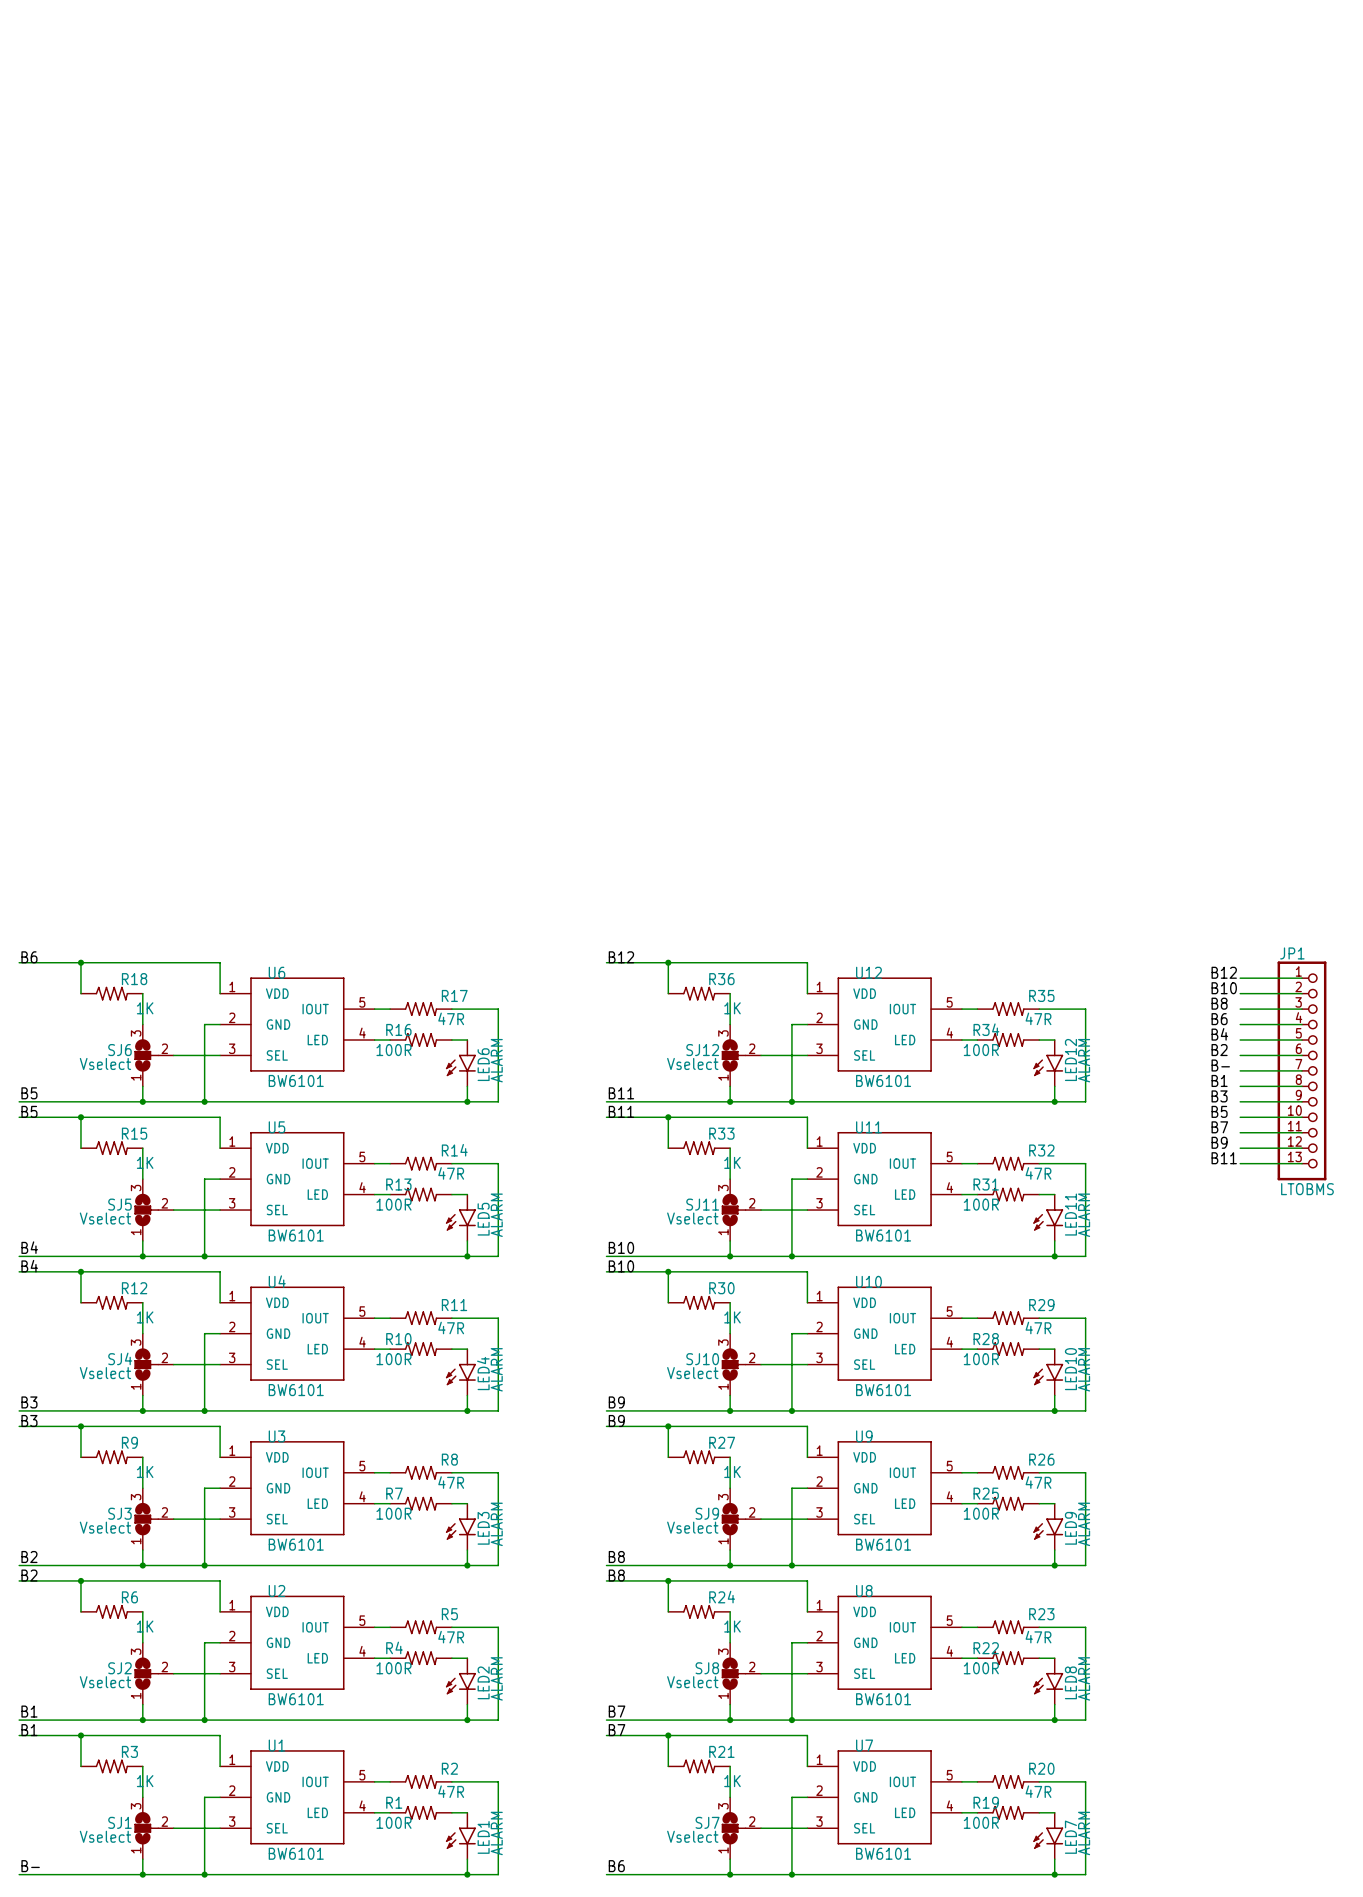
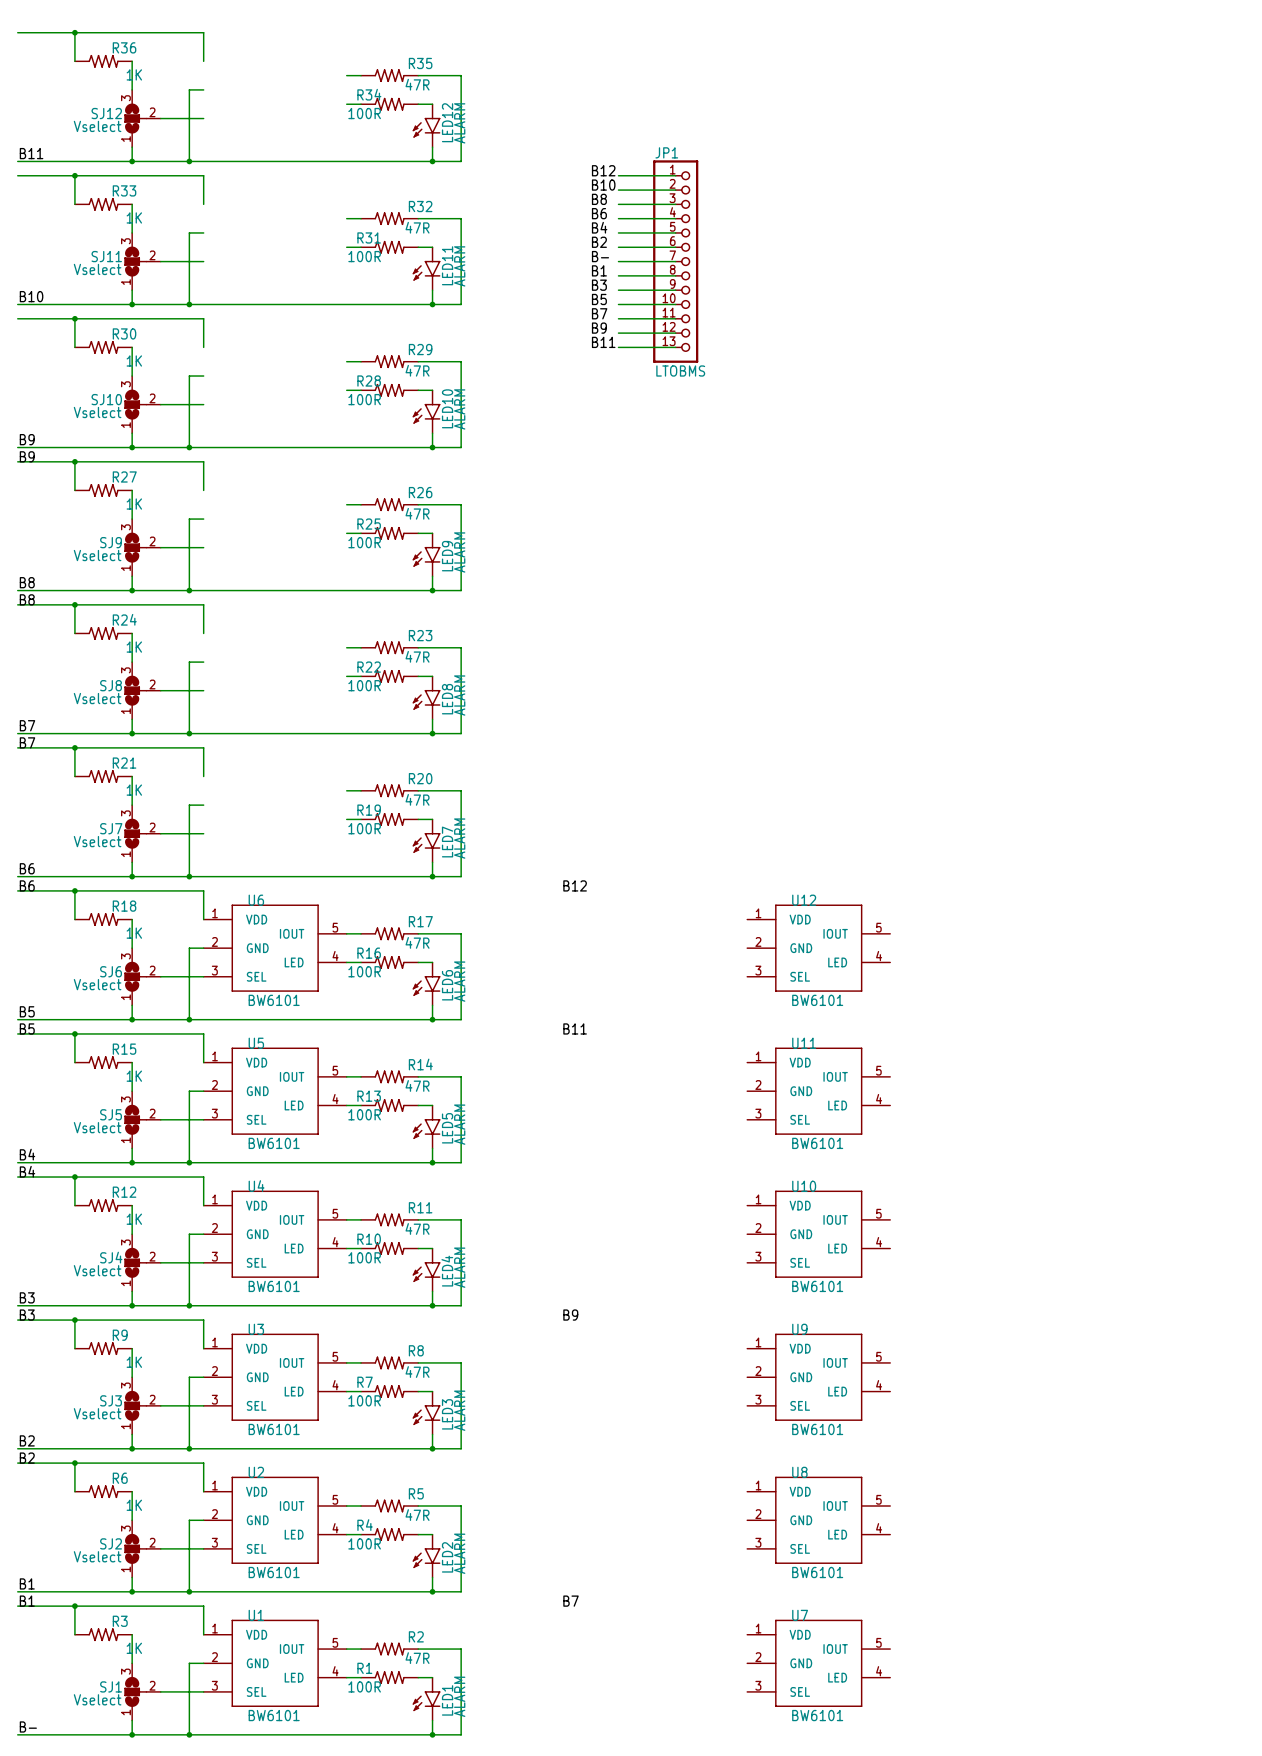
wire: none -> (17, 32) (203, 32) (203, 61)
wire: none -> (74, 32) (74, 61)
junction: none -> (74, 32)
wire: none -> (132, 61) (132, 89)
wire: none -> (346, 75) (361, 75)
wire: none -> (418, 75) (461, 75) (461, 161) (17, 161)
wire: none -> (203, 89) (189, 89) (189, 161)
wire: none -> (346, 104) (361, 104)
wire: none -> (418, 104) (432, 104)
wire: none -> (160, 118) (203, 118)
wire: none -> (132, 147) (132, 161)
wire: none -> (432, 147) (432, 161)
label: none -> B11 (31, 153)
junction: none -> (132, 161)
junction: none -> (189, 161)
junction: none -> (432, 161)
label: none -> B12 (603, 170)
wire: none -> (17, 175) (203, 175) (203, 204)
wire: none -> (74, 175) (74, 204)
junction: none -> (74, 175)
wire: none -> (618, 175) (675, 175)
label: none -> B10 (603, 185)
wire: none -> (618, 190) (675, 190)
label: none -> B8 (599, 199)
wire: none -> (132, 204) (132, 232)
wire: none -> (618, 204) (675, 204)
label: none -> B6 (599, 213)
wire: none -> (346, 218) (361, 218)
wire: none -> (418, 218) (461, 218) (461, 304) (17, 304)
wire: none -> (618, 218) (675, 218)
label: none -> B4 (599, 227)
wire: none -> (203, 232) (189, 232) (189, 304)
wire: none -> (618, 232) (675, 232)
label: none -> B2 (599, 242)
wire: none -> (346, 247) (361, 247)
wire: none -> (418, 247) (432, 247)
wire: none -> (618, 247) (675, 247)
label: none -> B- (600, 256)
wire: none -> (160, 261) (203, 261)
wire: none -> (618, 261) (675, 261)
label: none -> B1 (599, 270)
wire: none -> (618, 275) (675, 275)
label: none -> B3 (599, 285)
wire: none -> (132, 290) (132, 304)
wire: none -> (432, 290) (432, 304)
wire: none -> (618, 290) (675, 290)
label: none -> B10 (31, 296)
label: none -> B5 (599, 299)
junction: none -> (132, 304)
junction: none -> (189, 304)
junction: none -> (432, 304)
wire: none -> (618, 304) (675, 304)
label: none -> B7 (599, 313)
wire: none -> (17, 318) (203, 318) (203, 347)
wire: none -> (74, 318) (74, 347)
junction: none -> (74, 318)
wire: none -> (618, 318) (675, 318)
label: none -> B9 (599, 328)
wire: none -> (618, 333) (675, 333)
label: none -> B11 (603, 342)
wire: none -> (132, 347) (132, 376)
wire: none -> (618, 347) (675, 347)
wire: none -> (346, 361) (361, 361)
wire: none -> (418, 361) (461, 361) (461, 447) (17, 447)
wire: none -> (203, 376) (189, 376) (189, 447)
wire: none -> (346, 390) (361, 390)
wire: none -> (418, 390) (432, 390)
wire: none -> (160, 404) (203, 404)
wire: none -> (132, 433) (132, 447)
wire: none -> (432, 433) (432, 447)
label: none -> B9 (27, 439)
junction: none -> (132, 447)
junction: none -> (189, 447)
junction: none -> (432, 447)
label: none -> B9 (27, 456)
wire: none -> (17, 461) (203, 461) (203, 490)
wire: none -> (74, 461) (74, 490)
junction: none -> (74, 461)
wire: none -> (132, 490) (132, 519)
wire: none -> (346, 504) (361, 504)
wire: none -> (418, 504) (461, 504) (461, 590) (17, 590)
wire: none -> (203, 519) (189, 519) (189, 590)
wire: none -> (346, 533) (361, 533)
wire: none -> (418, 533) (432, 533)
wire: none -> (160, 547) (203, 547)
wire: none -> (132, 576) (132, 590)
wire: none -> (432, 576) (432, 590)
label: none -> B8 (27, 582)
junction: none -> (132, 590)
junction: none -> (189, 590)
junction: none -> (432, 590)
label: none -> B8 (27, 599)
wire: none -> (17, 604) (203, 604) (203, 633)
wire: none -> (74, 604) (74, 633)
junction: none -> (74, 604)
wire: none -> (132, 633) (132, 662)
wire: none -> (346, 647) (361, 647)
wire: none -> (418, 647) (461, 647) (461, 733) (17, 733)
wire: none -> (203, 662) (189, 662) (189, 733)
wire: none -> (346, 676) (361, 676)
wire: none -> (418, 676) (432, 676)
wire: none -> (160, 690) (203, 690)
wire: none -> (132, 719) (132, 733)
wire: none -> (432, 719) (432, 733)
label: none -> B7 (27, 725)
junction: none -> (132, 733)
junction: none -> (189, 733)
junction: none -> (432, 733)
label: none -> B7 (27, 742)
wire: none -> (17, 747) (203, 747) (203, 776)
wire: none -> (74, 747) (74, 776)
junction: none -> (74, 747)
wire: none -> (132, 776) (132, 805)
wire: none -> (346, 790) (361, 790)
wire: none -> (418, 790) (461, 790) (461, 876) (17, 876)
wire: none -> (203, 805) (189, 805) (189, 876)
wire: none -> (346, 819) (361, 819)
wire: none -> (418, 819) (432, 819)
wire: none -> (160, 833) (203, 833)
wire: none -> (132, 862) (132, 876)
wire: none -> (432, 862) (432, 876)
label: none -> B6 (27, 868)
junction: none -> (132, 876)
junction: none -> (189, 876)
junction: none -> (432, 876)
wire: (606, 962) (807, 962) (807, 993) -> none
wire: (668, 962) (668, 993) -> none
junction: (668, 962) -> none
label: B12 (1224, 972) -> none
wire: (1240, 978) (1302, 978) -> none
label: B10 (1224, 988) -> none
R36 position: (699, 993) -> (103, 61)
wire: (730, 993) (730, 1024) -> none
wire: (1240, 993) (1302, 993) -> none
label: B8 (1219, 1003) -> none
wire: (961, 1009) (977, 1009) -> none
R35 position: (1008, 1009) -> (389, 75)
wire: (1039, 1009) (1085, 1009) (1085, 1101) (606, 1101) -> none
wire: (1240, 1009) (1302, 1009) -> none
label: B6 (1219, 1019) -> none
wire: (807, 1024) (791, 1024) (791, 1101) -> none
wire: (1240, 1024) (1302, 1024) -> none
label: B4 (1219, 1034) -> none
wire: (961, 1040) (977, 1040) -> none
R34 position: (1008, 1040) -> (389, 104)
wire: (1039, 1040) (1054, 1040) -> none
wire: (1240, 1040) (1302, 1040) -> none
label: B2 (1219, 1050) -> none
SJ12 position: (741, 1055) -> (142, 118)
wire: (761, 1055) (807, 1055) -> none
wire: (1240, 1055) (1302, 1055) -> none
LED12 position: (1048, 1063) -> (426, 125)
label: B- (1220, 1065) -> none
wire: (1240, 1070) (1302, 1070) -> none
JP1 position: (1302, 1070) -> (675, 261)
label: B1 (1219, 1080) -> none
wire: (730, 1086) (730, 1101) -> none
wire: (1054, 1086) (1054, 1101) -> none
wire: (1240, 1086) (1302, 1086) -> none
label: B11 (621, 1093) -> none
label: B3 (1219, 1096) -> none
junction: (730, 1101) -> none
junction: (791, 1101) -> none
junction: (1054, 1101) -> none
wire: (1240, 1101) (1302, 1101) -> none
label: B5 (1219, 1111) -> none
wire: (606, 1117) (807, 1117) (807, 1148) -> none
wire: (668, 1117) (668, 1148) -> none
junction: (668, 1117) -> none
wire: (1240, 1117) (1302, 1117) -> none
label: B7 (1219, 1127) -> none
wire: (1240, 1132) (1302, 1132) -> none
label: B9 (1219, 1142) -> none
R33 position: (699, 1148) -> (103, 204)
wire: (730, 1148) (730, 1179) -> none
wire: (1240, 1148) (1302, 1148) -> none
label: B11 (1224, 1158) -> none
wire: (961, 1163) (977, 1163) -> none
R32 position: (1008, 1163) -> (389, 218)
wire: (1039, 1163) (1085, 1163) (1085, 1256) (606, 1256) -> none
wire: (1240, 1163) (1302, 1163) -> none
wire: (807, 1179) (791, 1179) (791, 1256) -> none
wire: (961, 1194) (977, 1194) -> none
R31 position: (1008, 1194) -> (389, 247)
wire: (1039, 1194) (1054, 1194) -> none
SJ11 position: (741, 1210) -> (142, 261)
wire: (761, 1210) (807, 1210) -> none
LED11 position: (1048, 1217) -> (426, 268)
wire: (730, 1240) (730, 1256) -> none
wire: (1054, 1240) (1054, 1256) -> none
label: B10 (621, 1247) -> none
junction: (730, 1256) -> none
junction: (791, 1256) -> none
junction: (1054, 1256) -> none
label: B10 (621, 1266) -> none
wire: (606, 1271) (807, 1271) (807, 1302) -> none
wire: (668, 1271) (668, 1302) -> none
junction: (668, 1271) -> none
R30 position: (699, 1302) -> (103, 347)
wire: (730, 1302) (730, 1333) -> none
wire: (961, 1318) (977, 1318) -> none
R29 position: (1008, 1318) -> (389, 361)
wire: (1039, 1318) (1085, 1318) (1085, 1410) (606, 1410) -> none
wire: (807, 1333) (791, 1333) (791, 1410) -> none
wire: (961, 1349) (977, 1349) -> none
R28 position: (1008, 1349) -> (389, 390)
wire: (1039, 1349) (1054, 1349) -> none
SJ10 position: (741, 1364) -> (142, 404)
wire: (761, 1364) (807, 1364) -> none
LED10 position: (1048, 1372) -> (426, 411)
wire: (730, 1395) (730, 1410) -> none
wire: (1054, 1395) (1054, 1410) -> none
label: B9 (616, 1402) -> none
junction: (730, 1410) -> none
junction: (791, 1410) -> none
junction: (1054, 1410) -> none
wire: (606, 1426) (807, 1426) (807, 1457) -> none
wire: (668, 1426) (668, 1457) -> none
junction: (668, 1426) -> none
R27 position: (699, 1457) -> (103, 490)
wire: (730, 1457) (730, 1488) -> none
wire: (961, 1472) (977, 1472) -> none
R26 position: (1008, 1472) -> (389, 504)
wire: (1039, 1472) (1085, 1472) (1085, 1565) (606, 1565) -> none
wire: (807, 1488) (791, 1488) (791, 1565) -> none
wire: (961, 1503) (977, 1503) -> none
R25 position: (1008, 1503) -> (389, 533)
wire: (1039, 1503) (1054, 1503) -> none
SJ9 position: (741, 1519) -> (142, 547)
wire: (761, 1519) (807, 1519) -> none
LED9 position: (1048, 1526) -> (426, 554)
wire: (730, 1550) (730, 1565) -> none
wire: (1054, 1550) (1054, 1565) -> none
label: B8 (616, 1557) -> none
junction: (730, 1565) -> none
junction: (791, 1565) -> none
junction: (1054, 1565) -> none
label: B8 (616, 1575) -> none
wire: (606, 1580) (807, 1580) (807, 1611) -> none
wire: (668, 1580) (668, 1611) -> none
junction: (668, 1580) -> none
R24 position: (699, 1611) -> (103, 633)
wire: (730, 1611) (730, 1642) -> none
wire: (961, 1627) (977, 1627) -> none
R23 position: (1008, 1627) -> (389, 647)
wire: (1039, 1627) (1085, 1627) (1085, 1720) (606, 1720) -> none
wire: (807, 1642) (791, 1642) (791, 1720) -> none
wire: (961, 1658) (977, 1658) -> none
R22 position: (1008, 1658) -> (389, 676)
wire: (1039, 1658) (1054, 1658) -> none
SJ8 position: (741, 1673) -> (142, 690)
wire: (761, 1673) (807, 1673) -> none
LED8 position: (1048, 1681) -> (426, 697)
wire: (730, 1704) (730, 1720) -> none
wire: (1054, 1704) (1054, 1720) -> none
label: B7 (617, 1711) -> none
junction: (730, 1720) -> none
junction: (791, 1720) -> none
junction: (1054, 1720) -> none
wire: (606, 1735) (807, 1735) (807, 1766) -> none
wire: (668, 1735) (668, 1766) -> none
junction: (668, 1735) -> none
R21 position: (699, 1766) -> (103, 776)
wire: (730, 1766) (730, 1797) -> none
wire: (961, 1781) (977, 1781) -> none
R20 position: (1008, 1781) -> (389, 790)
wire: (1039, 1781) (1085, 1781) (1085, 1874) (606, 1874) -> none
wire: (807, 1797) (791, 1797) (791, 1874) -> none
wire: (961, 1812) (977, 1812) -> none
R19 position: (1008, 1812) -> (389, 819)
wire: (1039, 1812) (1054, 1812) -> none
SJ7 position: (741, 1828) -> (142, 833)
wire: (761, 1828) (807, 1828) -> none
LED7 position: (1048, 1835) -> (426, 840)
wire: (730, 1859) (730, 1874) -> none
wire: (1054, 1859) (1054, 1874) -> none
label: B6 (616, 1866) -> none
junction: (730, 1874) -> none
junction: (791, 1874) -> none
junction: (1054, 1874) -> none

